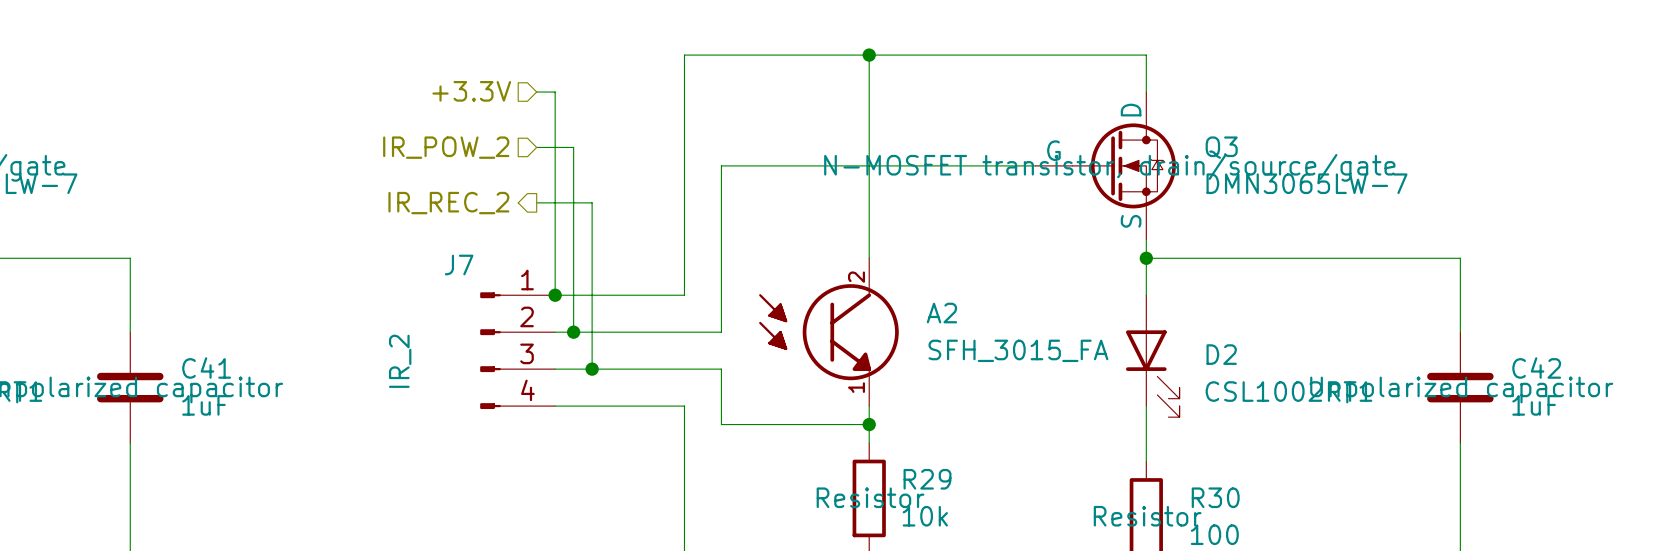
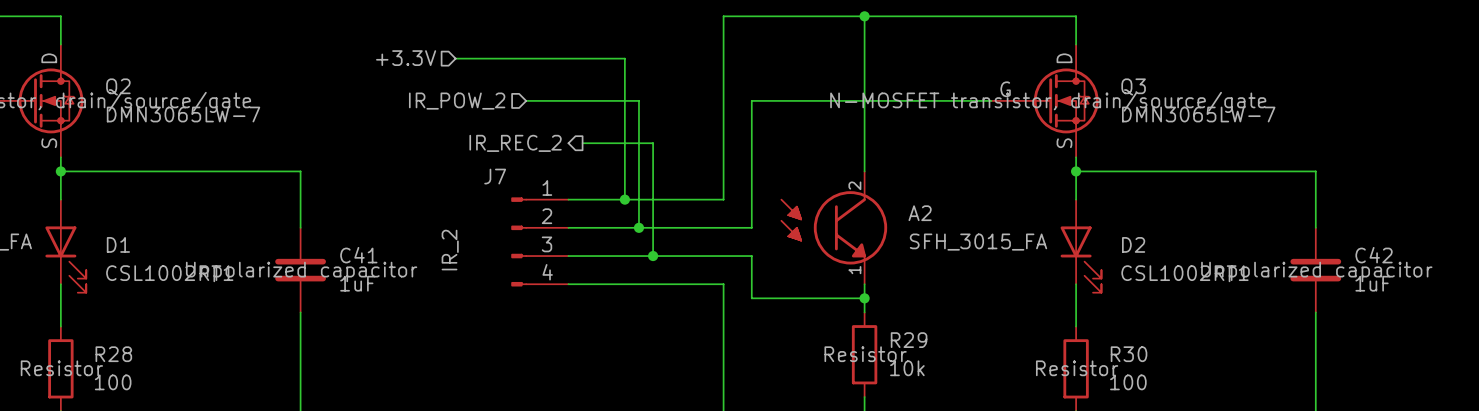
hierarchical label position: +3.3V (471, 91) -> +3.3V (406, 58)
wire: (536, 92) (555, 92) (555, 110) -> (455, 58) (624, 58)
hierarchical label position: IR_POW_2 (446, 147) -> IR_POW_2 (457, 101)
wire: (536, 147) (573, 147) (573, 165) -> (526, 100) (638, 100)
wire: (536, 202) (592, 202) (592, 221) -> (582, 143) (653, 143)
hierarchical label position: IR_REC_2 (448, 203) -> IR_REC_2 (515, 143)
J7 position: (517, 350) -> (539, 241)

